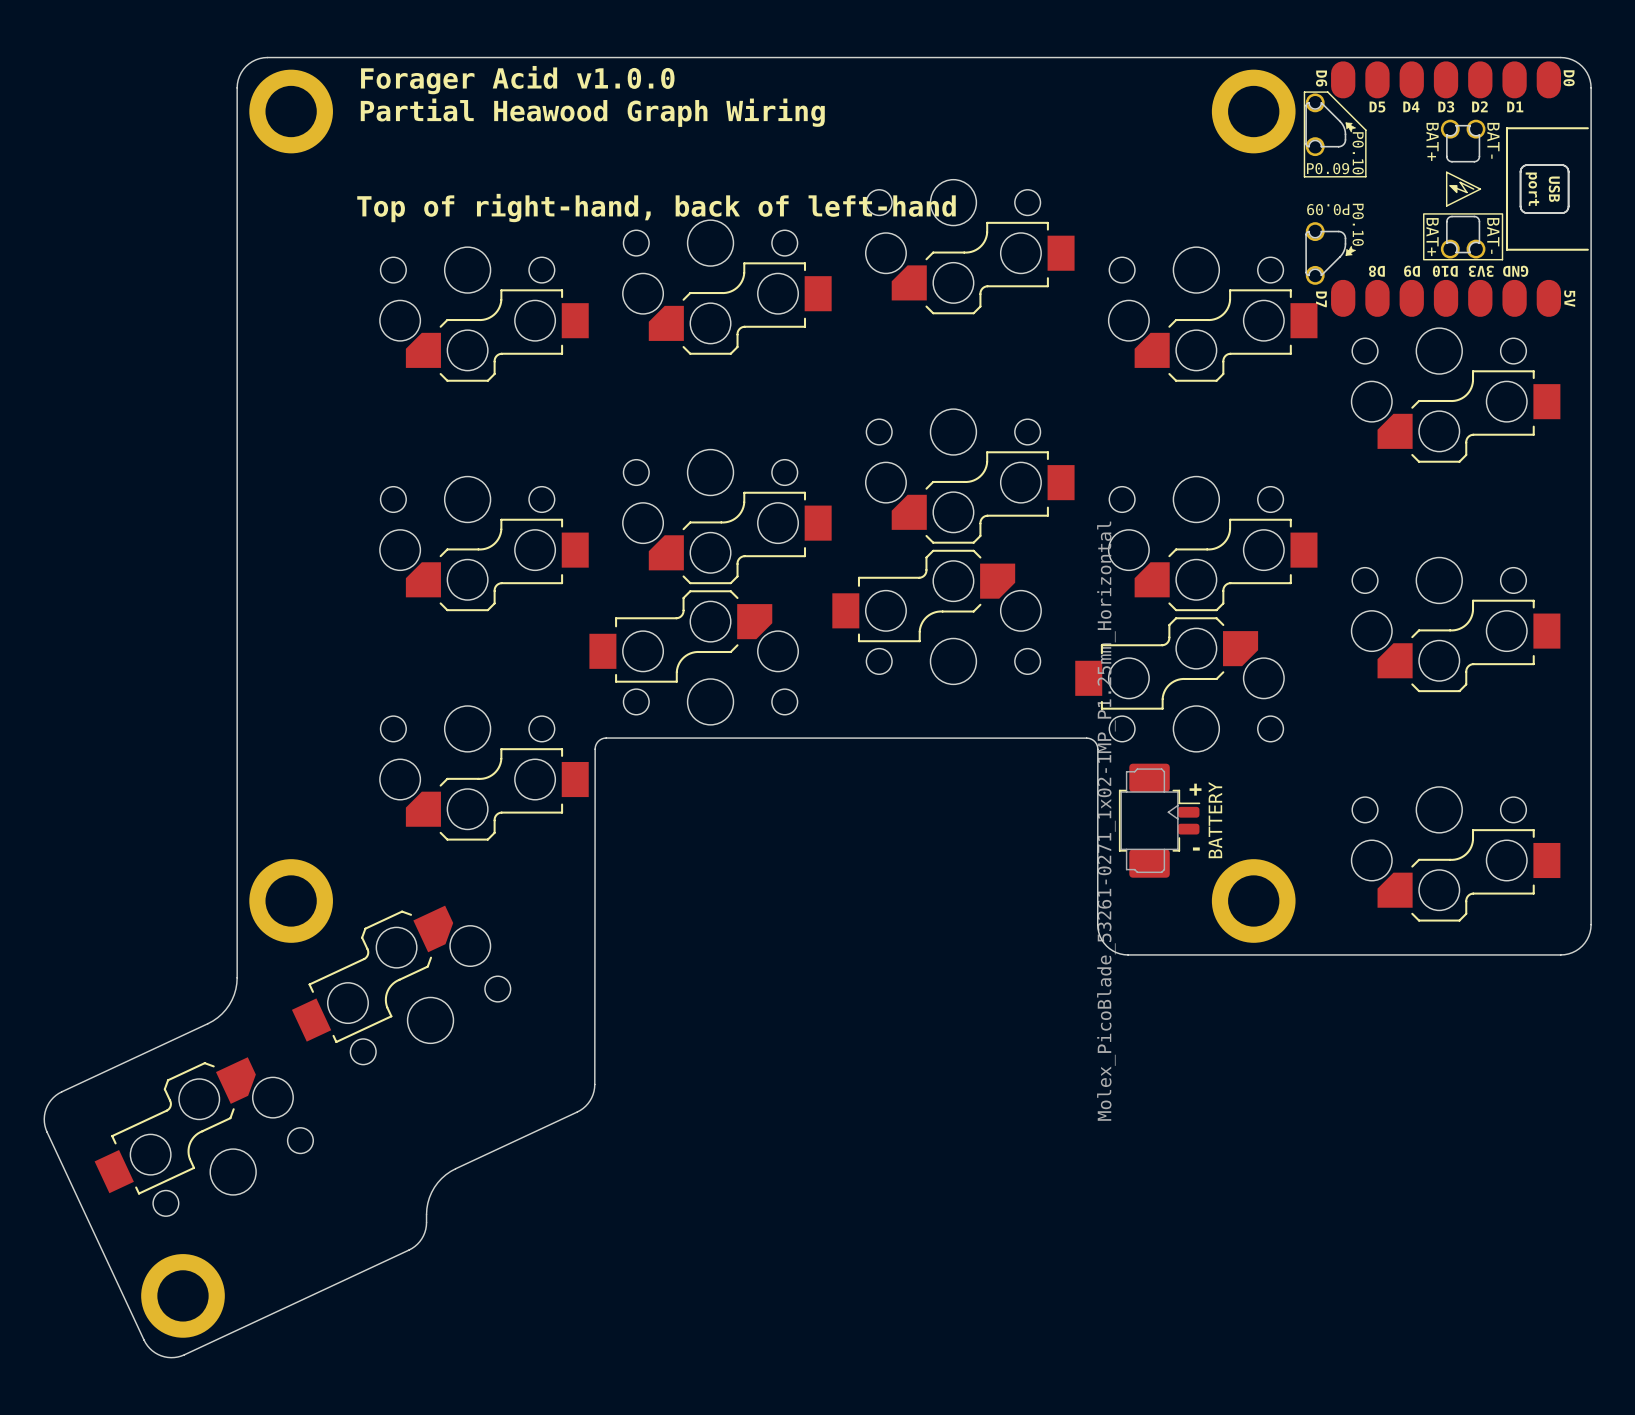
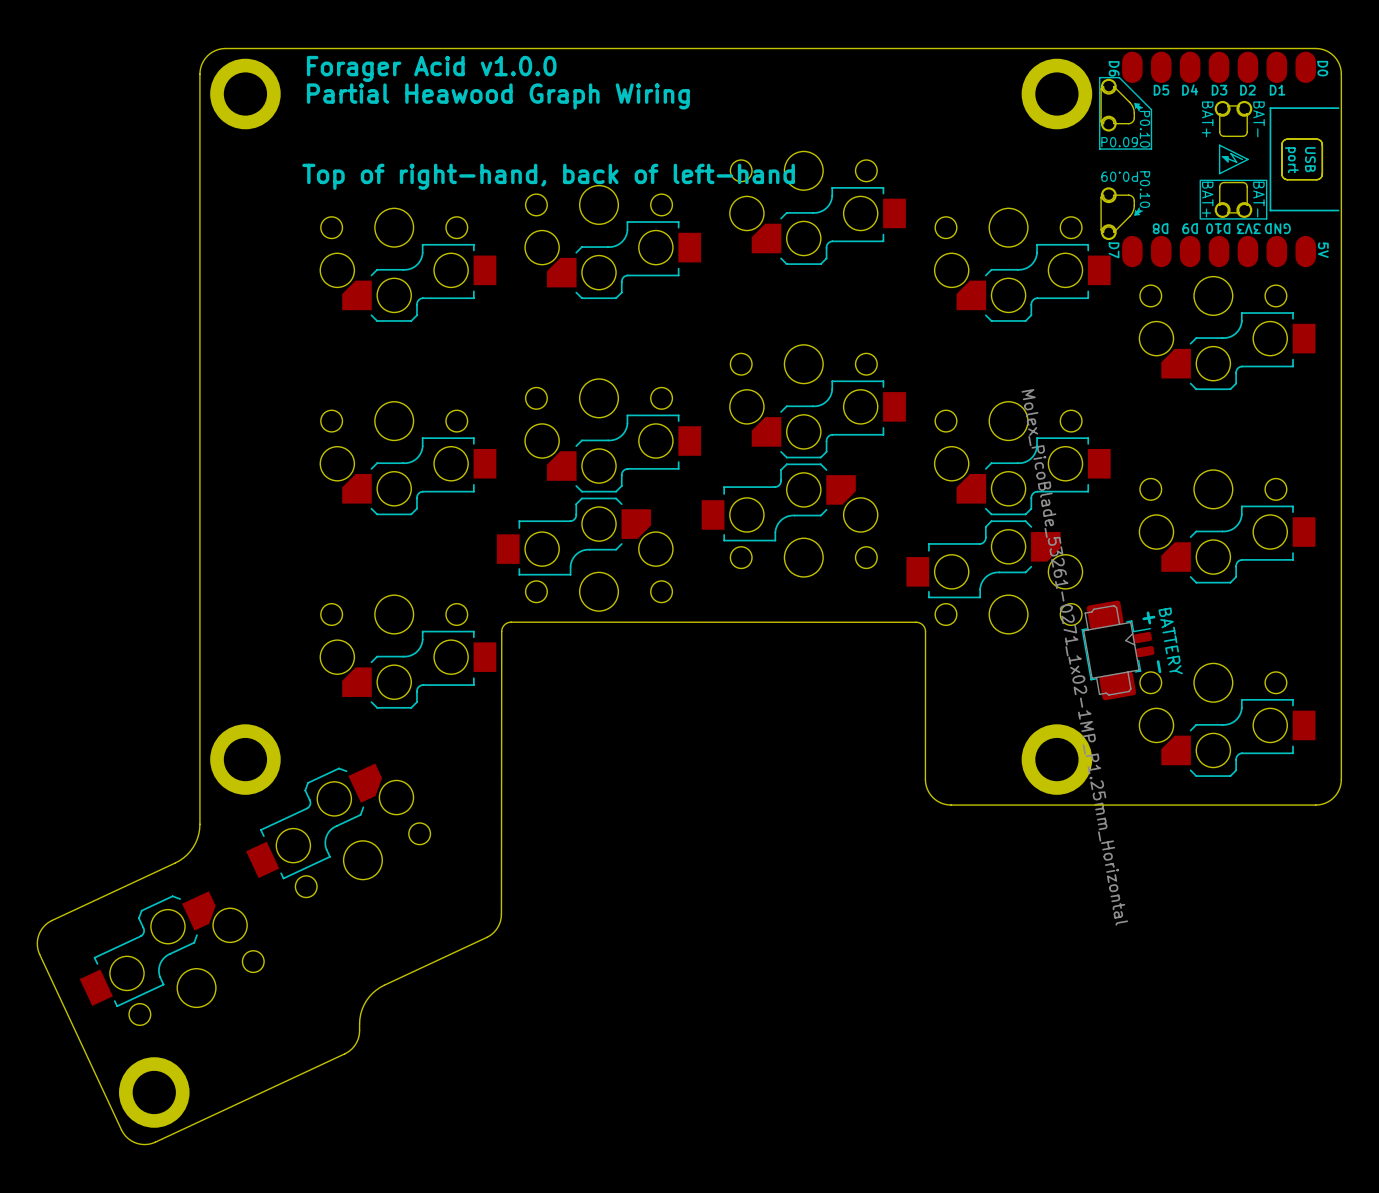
BATTERY: none -> Molex_PicoBlade_53261-0271_1x02-1MP_P1.25mm_Horizontal (1118, 650)
text rotation: 0° (1195, 789) -> 10° counterclockwise (1148, 617)
text position: + (1195, 789) -> + (1148, 617)
BATTERY: Molex_PicoBlade_53261-0271_1x02-1MP_P1.25mm_Horizontal (1159, 820) -> none
text rotation: 0° (1196, 849) -> 100° counterclockwise (1159, 666)
text position: - (1196, 849) -> - (1159, 666)

